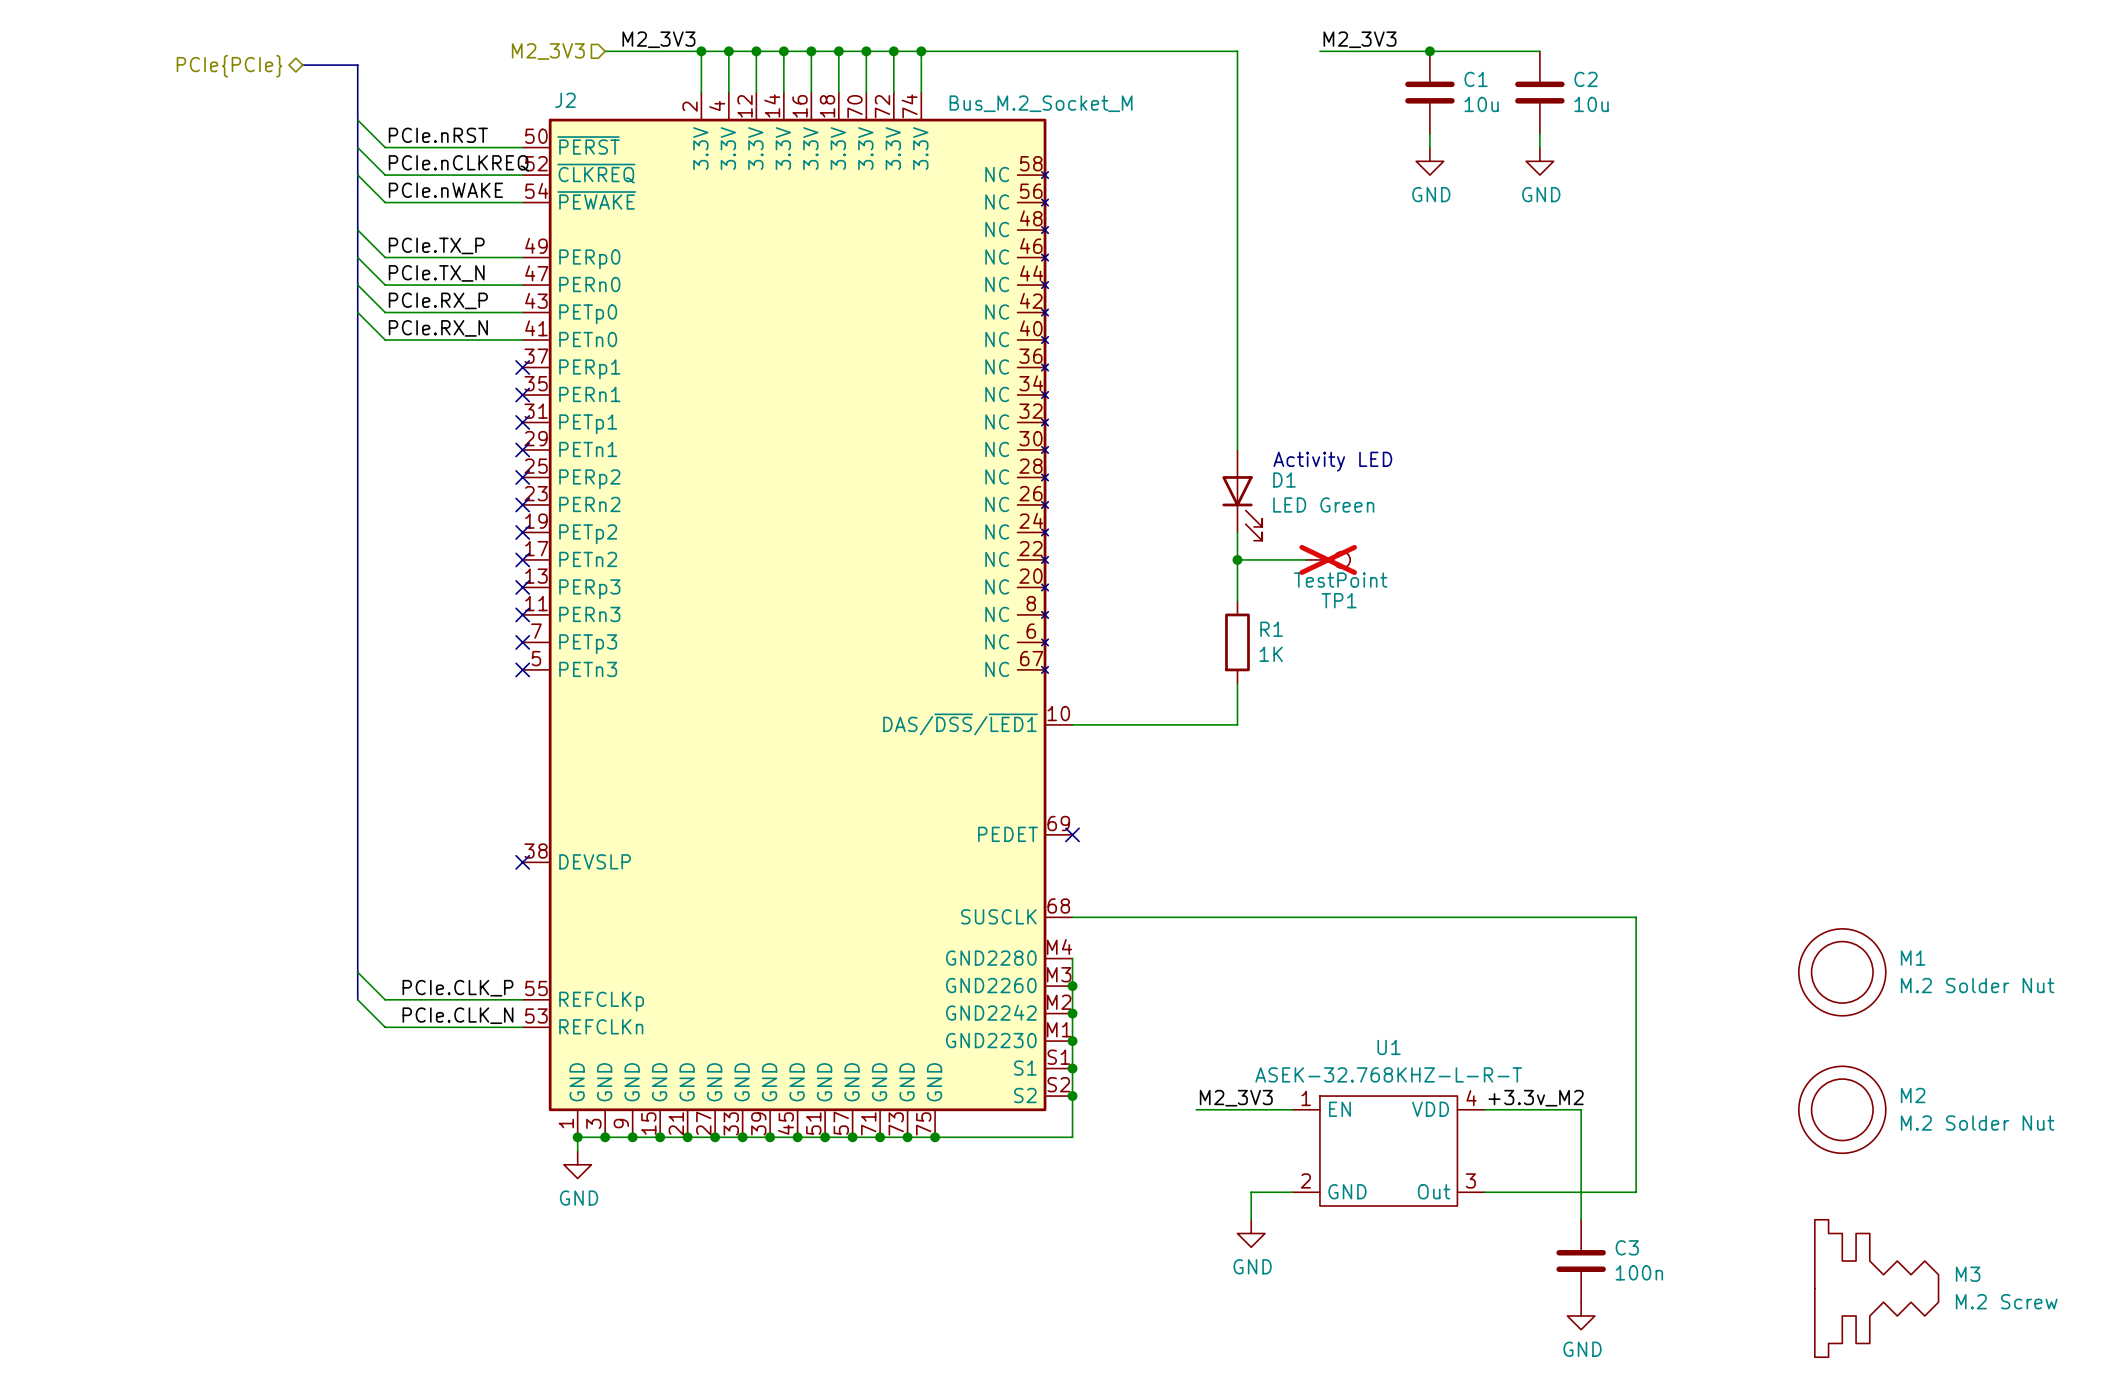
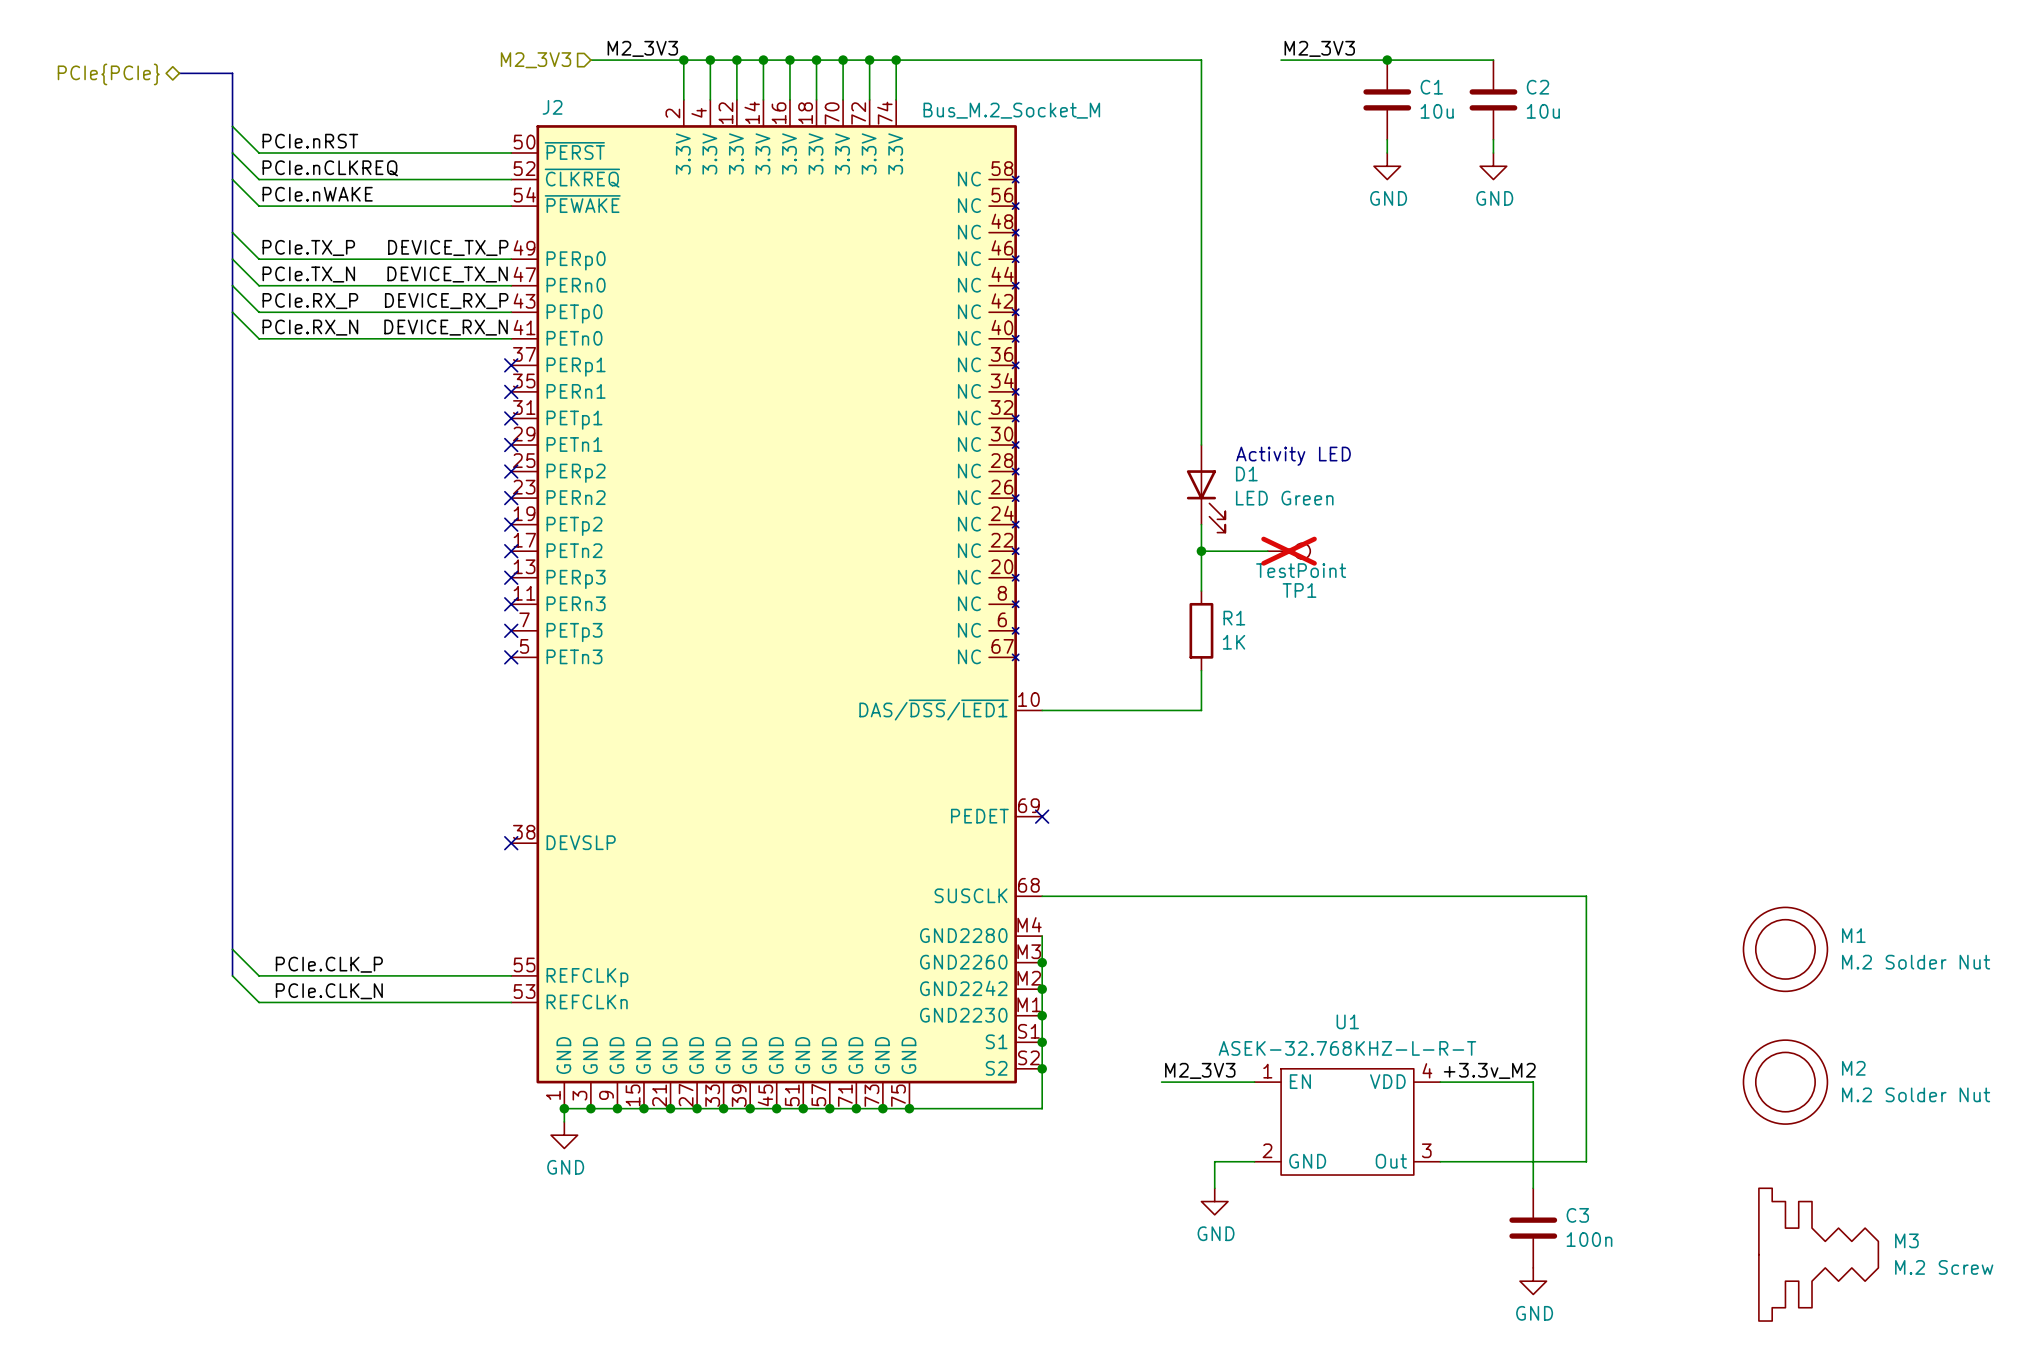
bus: (302, 65) (357, 65) (357, 999) -> (179, 73) (232, 73) (232, 975)
hierarchical label position: PCIe{PCIe} (229, 66) -> PCIe{PCIe} (108, 74)
wire: (357, 120) (385, 147) -> (232, 126) (259, 153) (378, 153)
label position: PCIe.nRST (438, 135) -> PCIe.nRST (310, 141)
wire: (357, 147) (385, 175) -> (232, 153) (259, 179) (378, 179)
label position: PCIe.nCLKREQ (458, 163) -> PCIe.nCLKREQ (330, 168)
wire: (357, 175) (385, 202) -> (232, 179) (259, 206) (378, 206)
label position: PCIe.nWAKE (445, 190) -> PCIe.nWAKE (317, 194)
wire: (357, 230) (385, 257) -> (232, 232) (259, 259) (378, 259)
label position: PCIe.TX_P (436, 245) -> PCIe.TX_P (308, 247)
label: none -> DEVICE_TX_P (448, 247)
wire: (357, 257) (385, 285) -> (232, 259) (259, 285) (378, 285)
label position: PCIe.TX_N (436, 273) -> PCIe.TX_N (308, 274)
label: none -> DEVICE_TX_N (447, 274)
wire: (357, 285) (385, 312) -> (232, 285) (259, 312) (378, 312)
label position: PCIe.RX_P (438, 300) -> PCIe.RX_P (310, 301)
label: none -> DEVICE_RX_P (446, 301)
wire: (357, 312) (385, 340) -> (232, 312) (259, 338) (378, 338)
label position: PCIe.RX_N (438, 328) -> PCIe.RX_N (310, 327)
label: none -> DEVICE_RX_N (446, 327)
wire: (357, 972) (385, 999) -> (232, 949) (259, 975) (378, 975)
label position: PCIe.CLK_P (457, 988) -> PCIe.CLK_P (329, 964)
wire: (357, 999) (385, 1027) -> (232, 975) (259, 1002) (378, 1002)
label position: PCIe.CLK_N (457, 1015) -> PCIe.CLK_N (329, 991)

